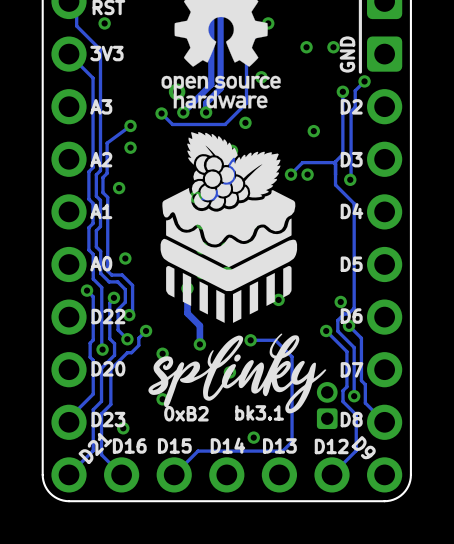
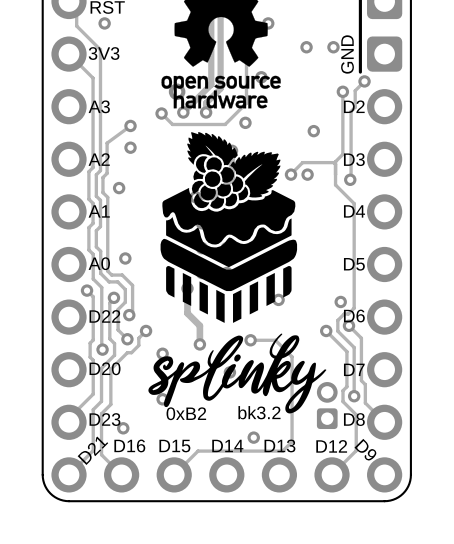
text: bk3.1 (259, 412) -> bk3.2 (259, 412)

